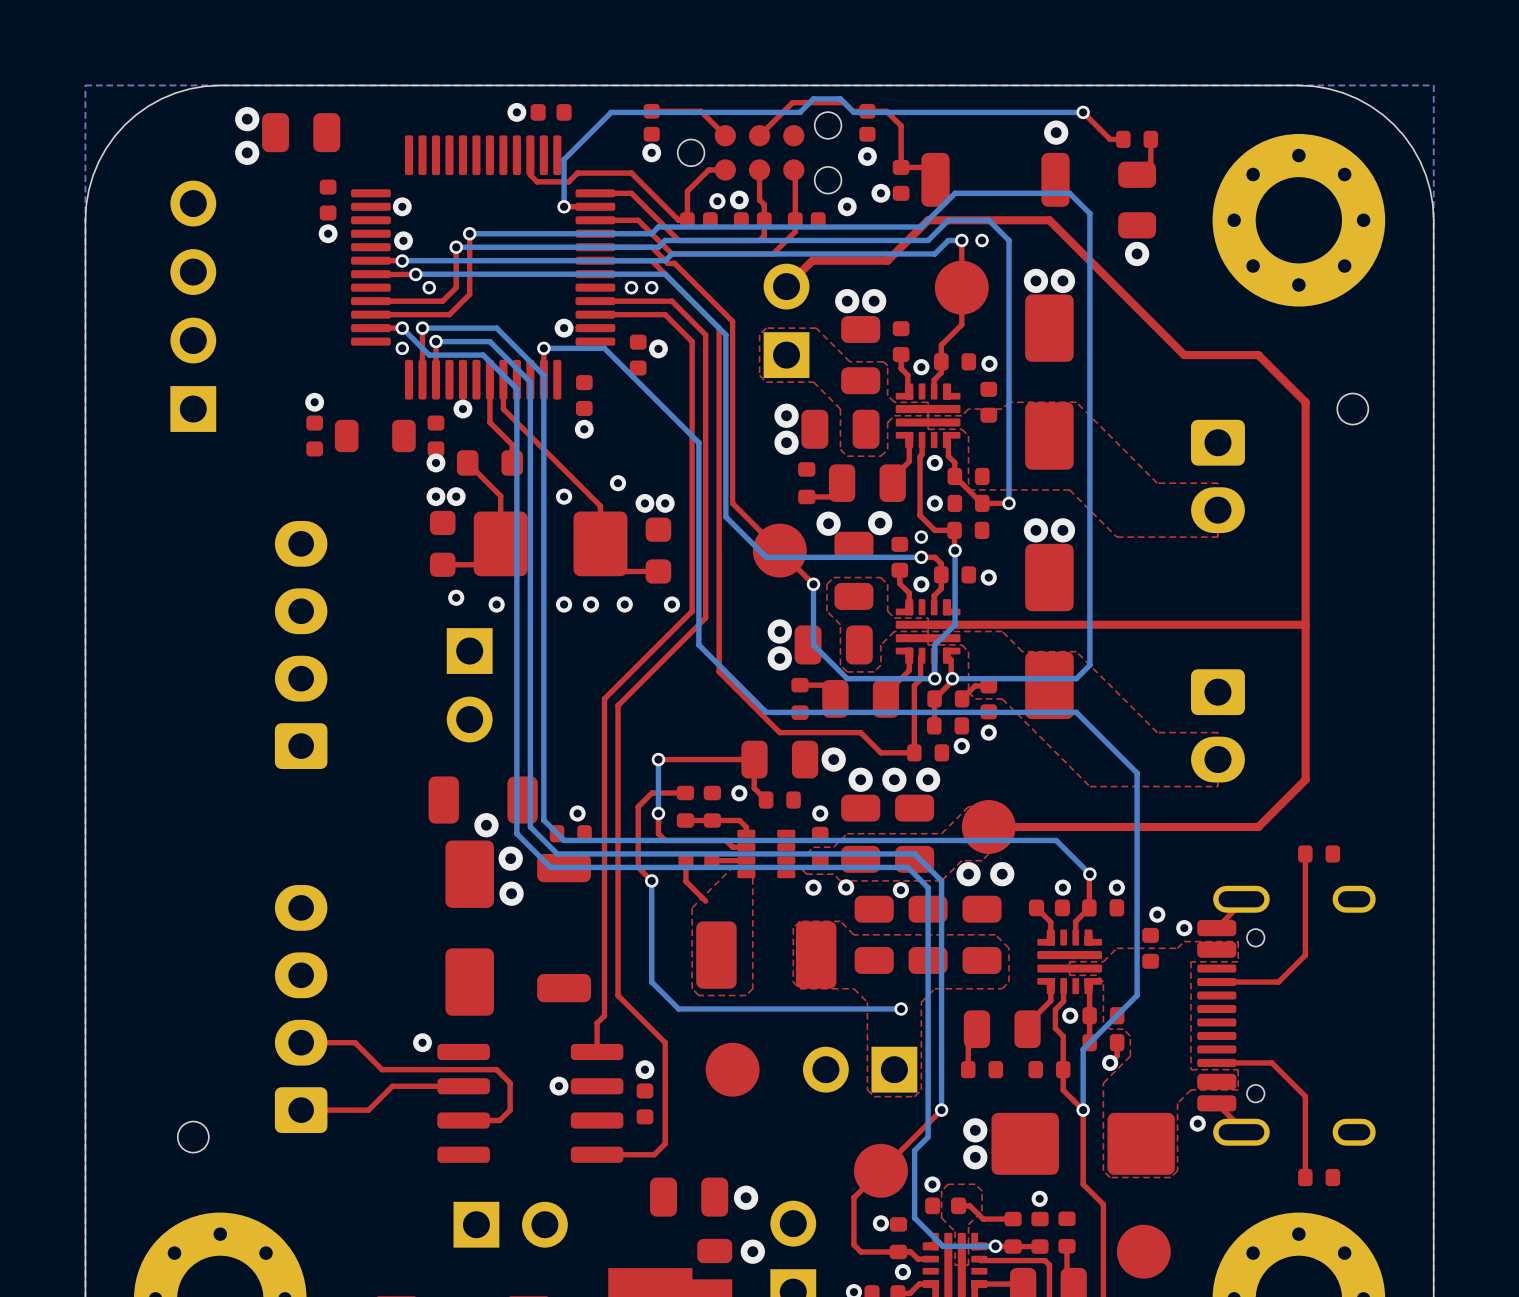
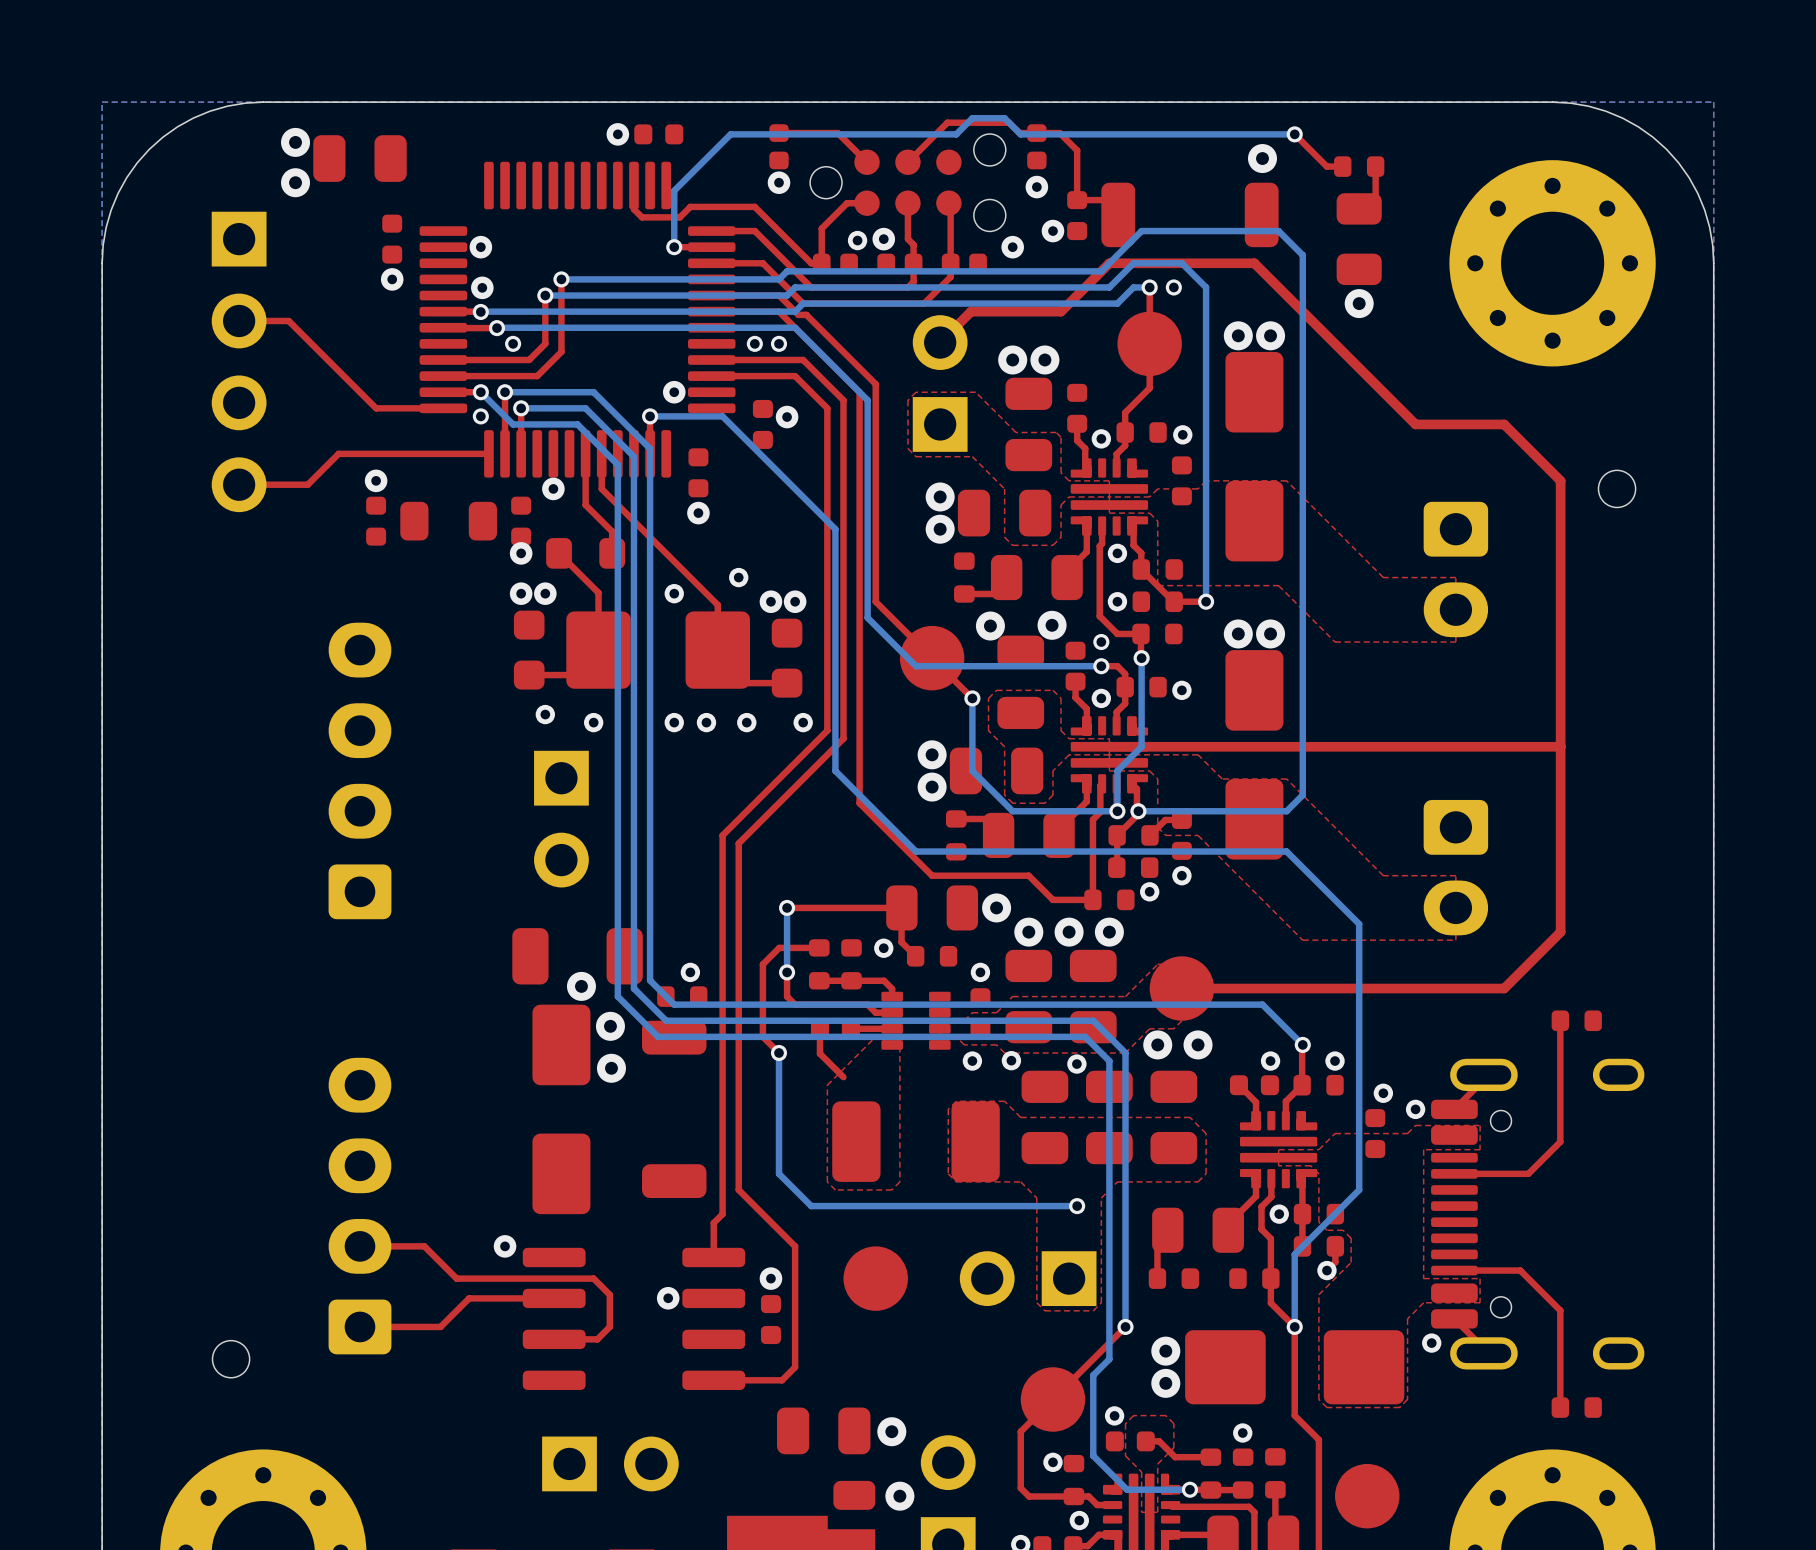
top track: none -> (239, 320) (288, 320) (376, 408) (443, 408)
part rotation: 0° (193, 306) -> 180° (239, 361)
top track: none -> (488, 453) (338, 453) (307, 484) (239, 484)

